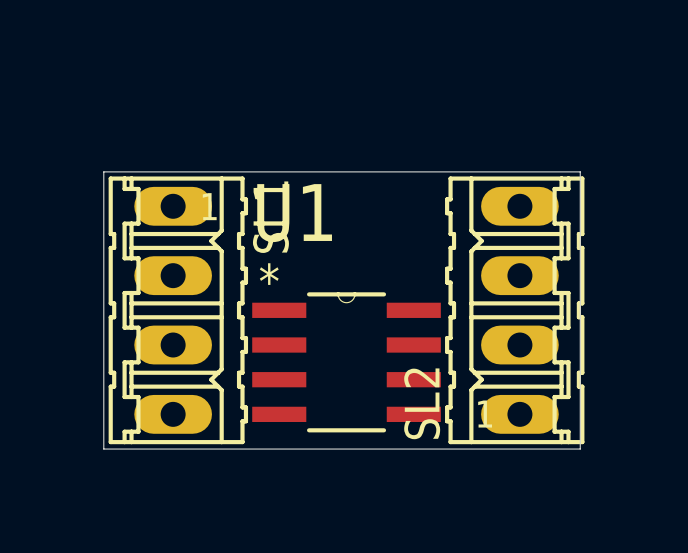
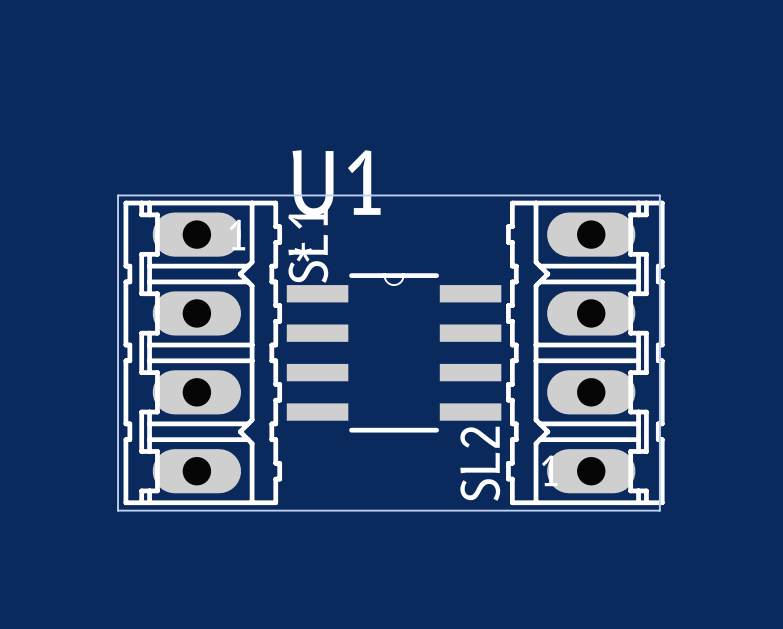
U1 position: (346, 362) -> (394, 352)

